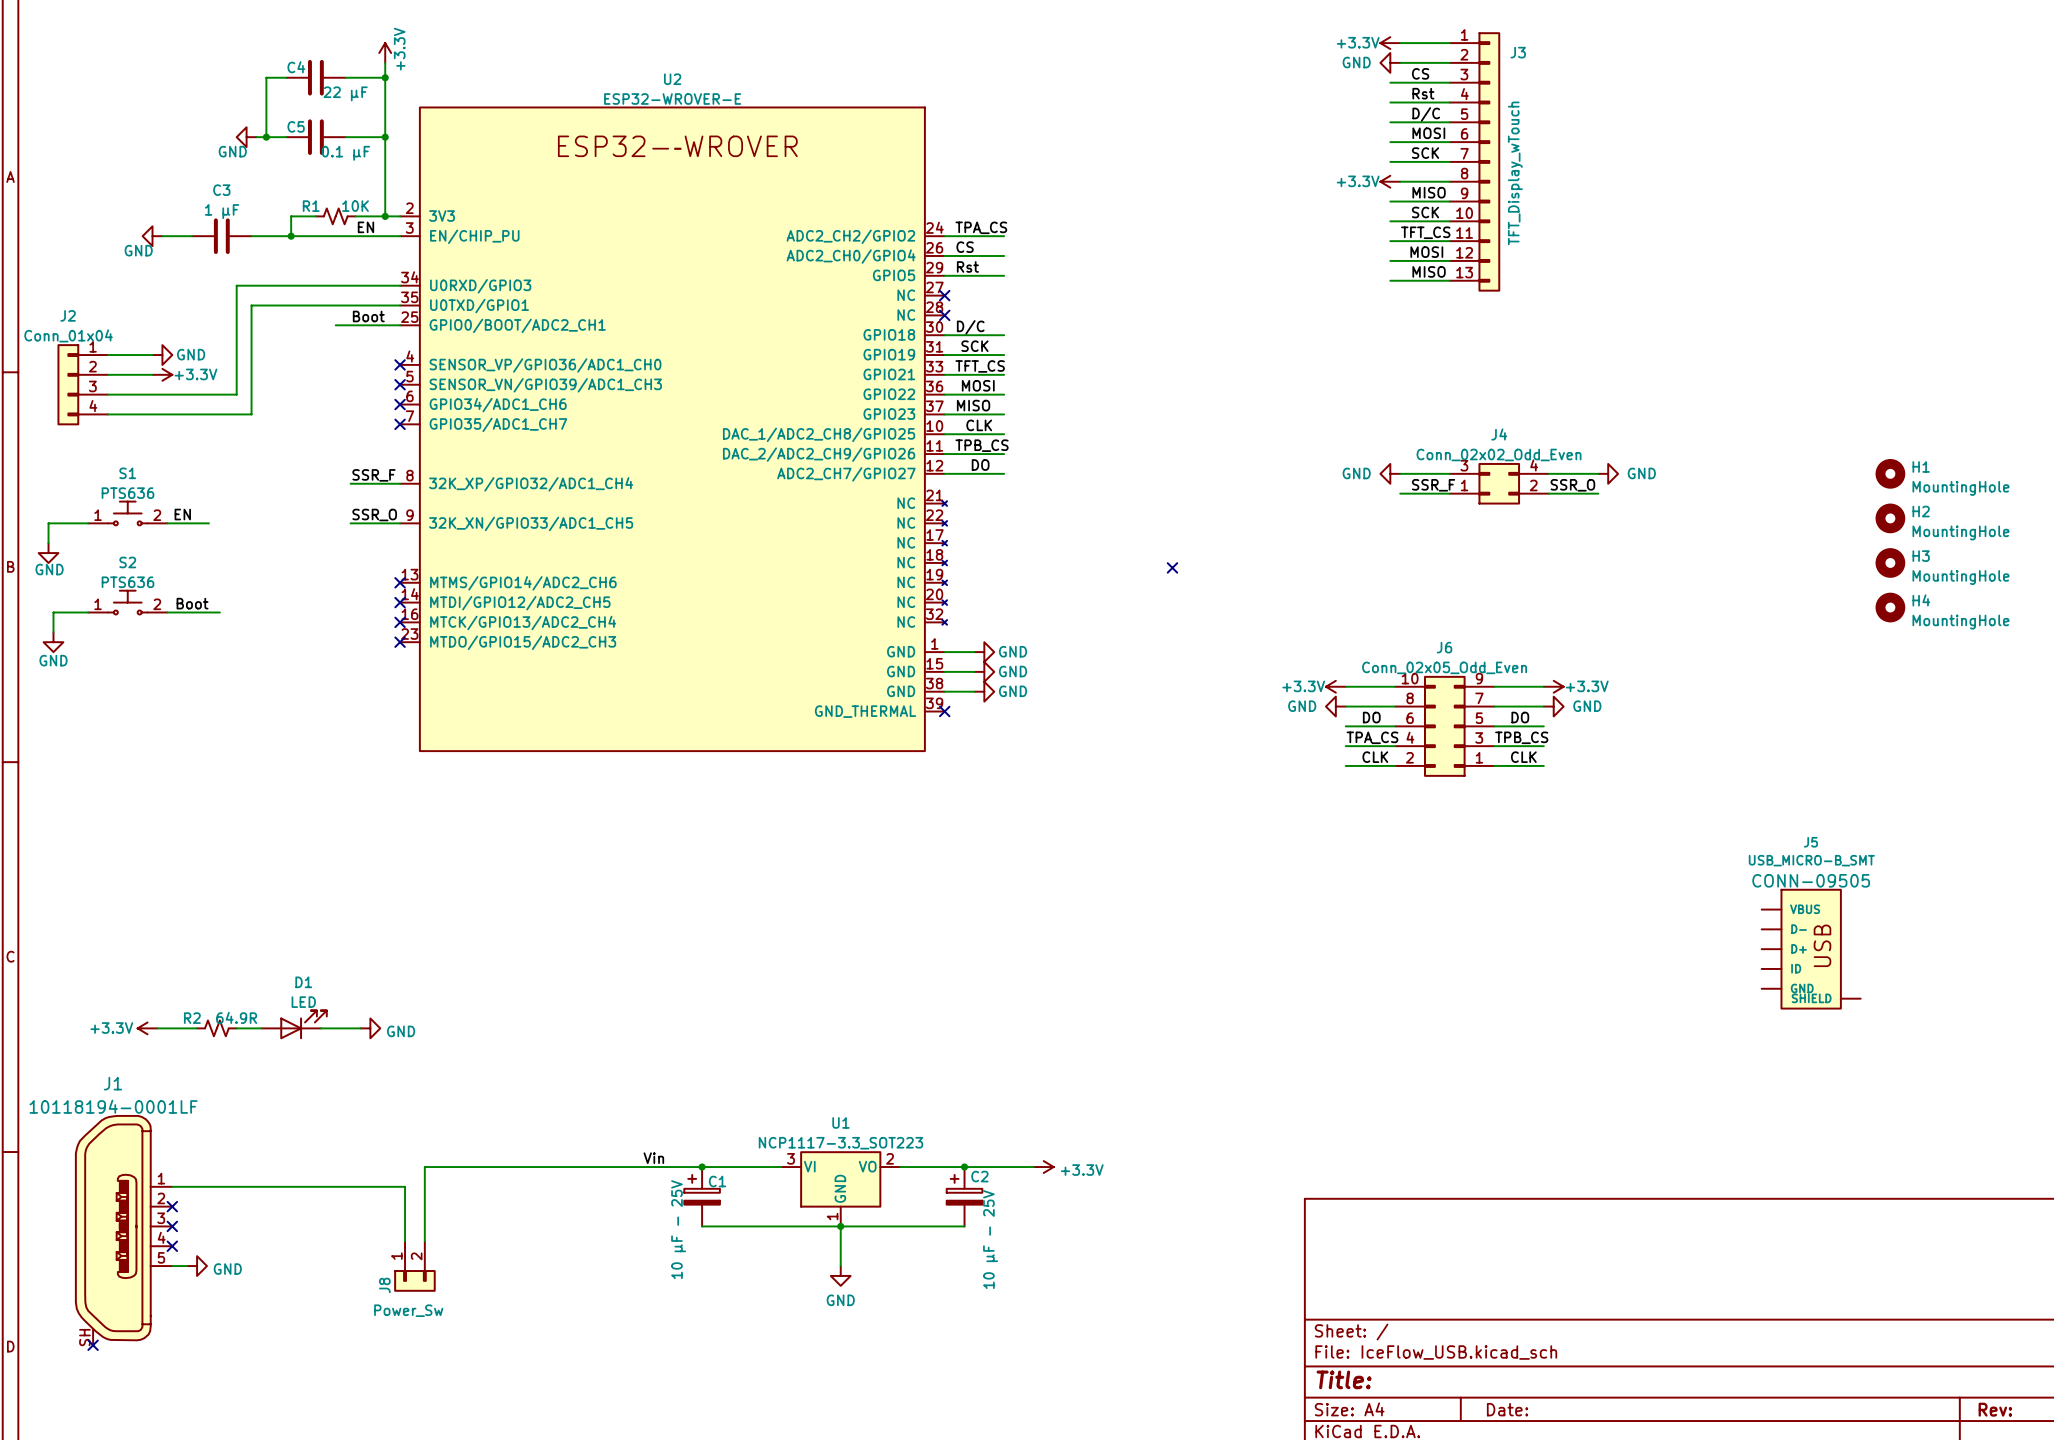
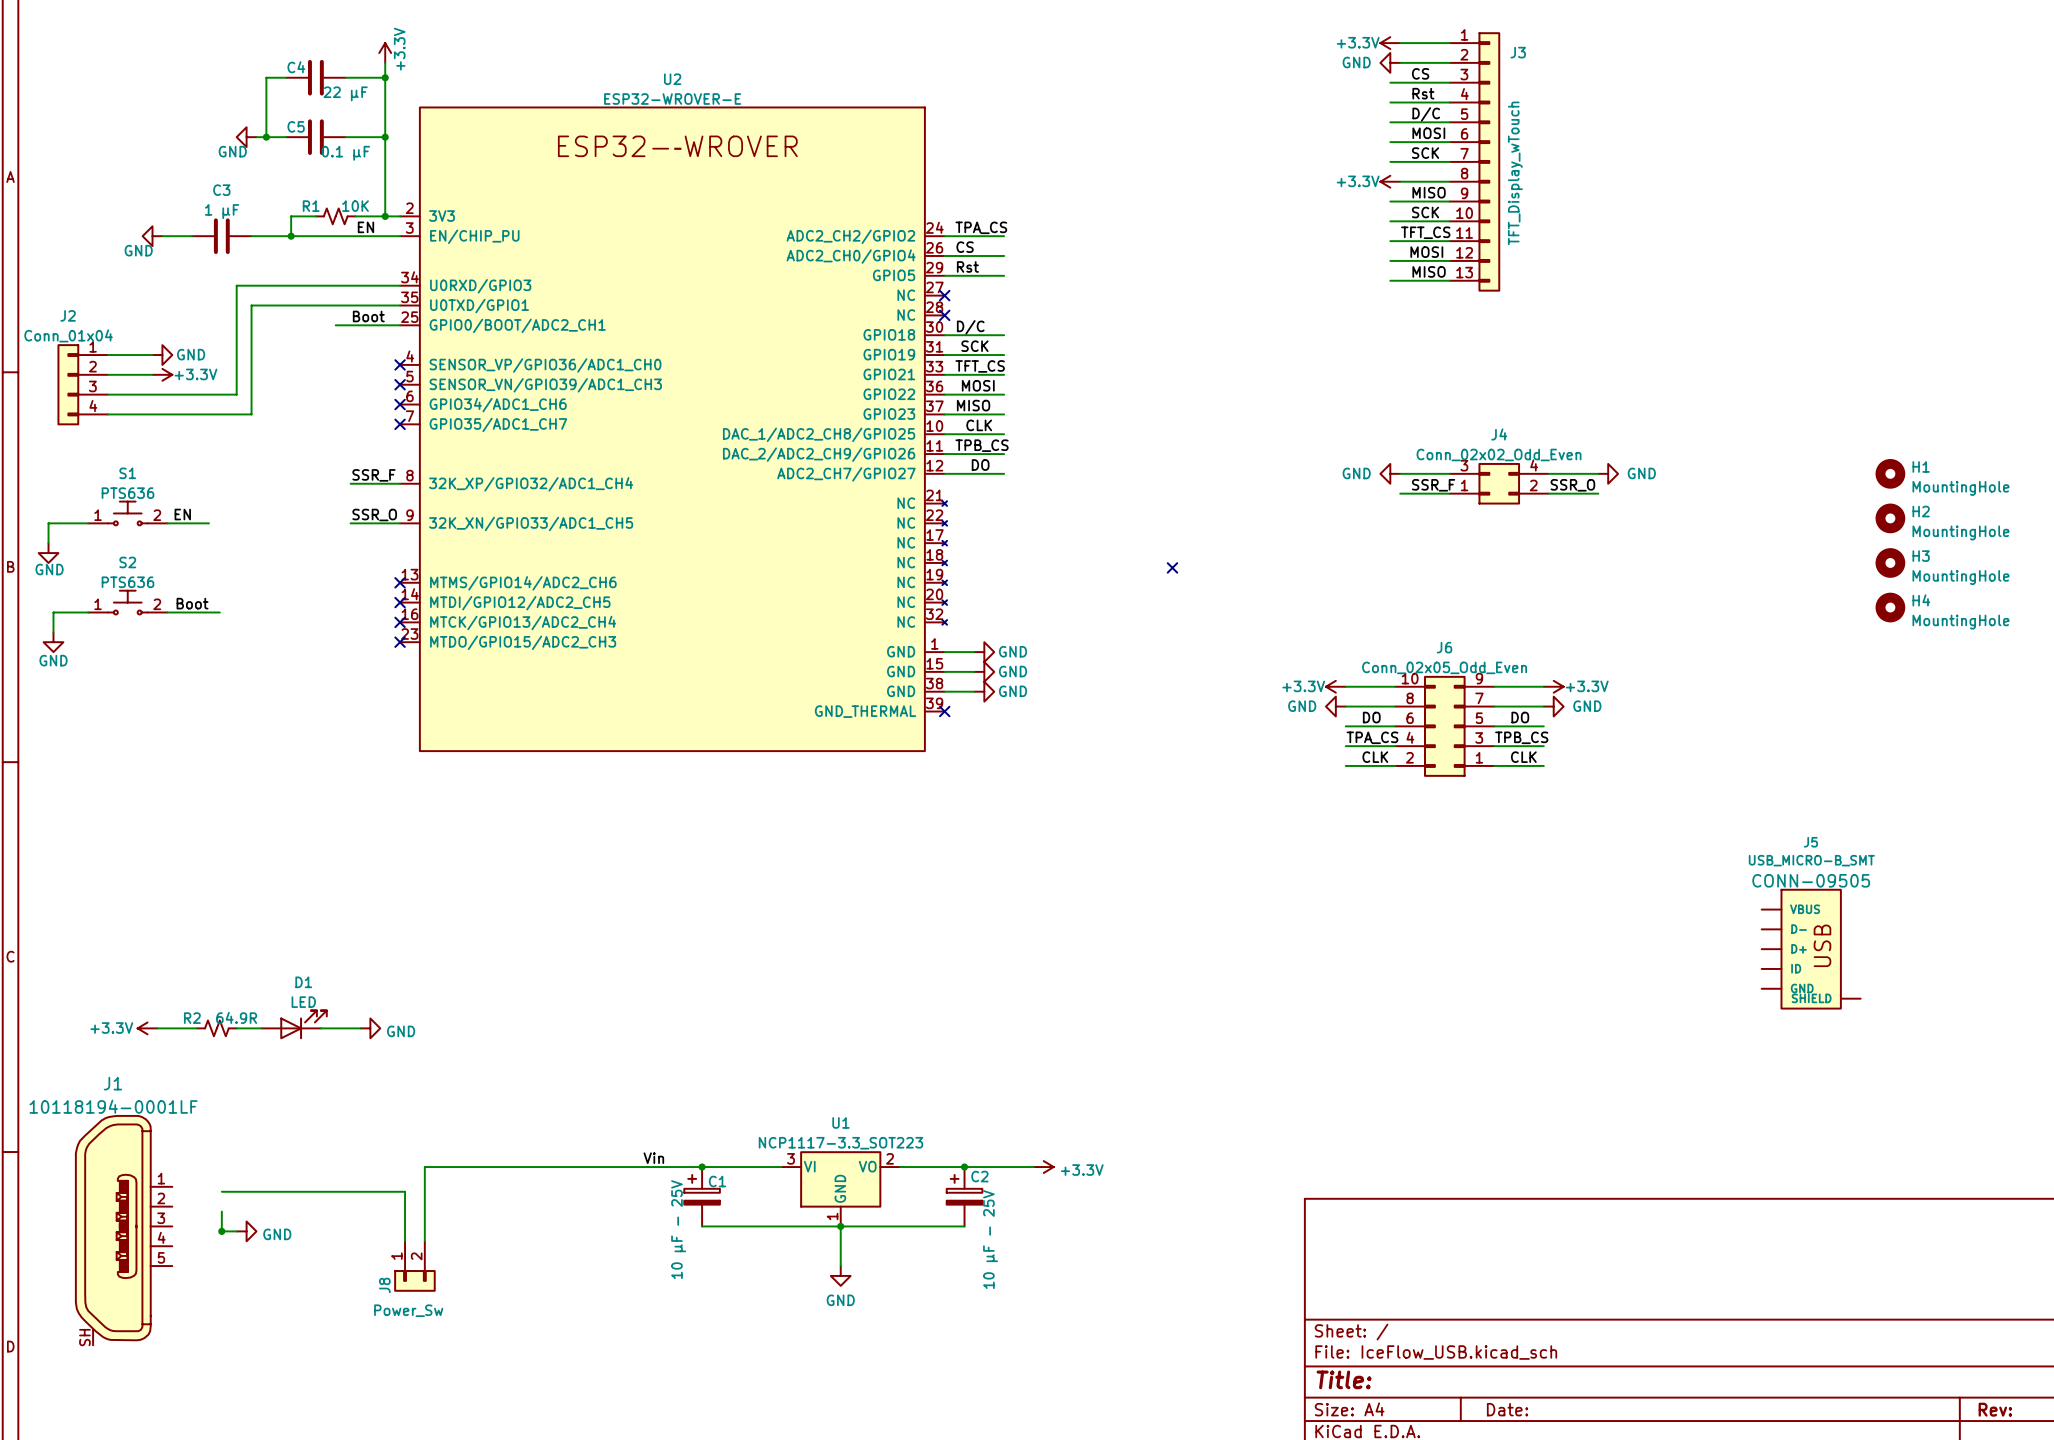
wire: (172, 1186) (405, 1186) (405, 1191) -> (221, 1191) (405, 1191)
no-connect mark: (172, 1206) -> none
wire: none -> (221, 1211) (221, 1231) (236, 1231)
no-connect mark: (172, 1226) -> none
junction: none -> (221, 1231)
no-connect mark: (172, 1246) -> none
wire: (172, 1266) (187, 1266) -> none
power symbol position: GND (197, 1266) -> GND (246, 1231)
no-connect mark: (93, 1345) -> none

